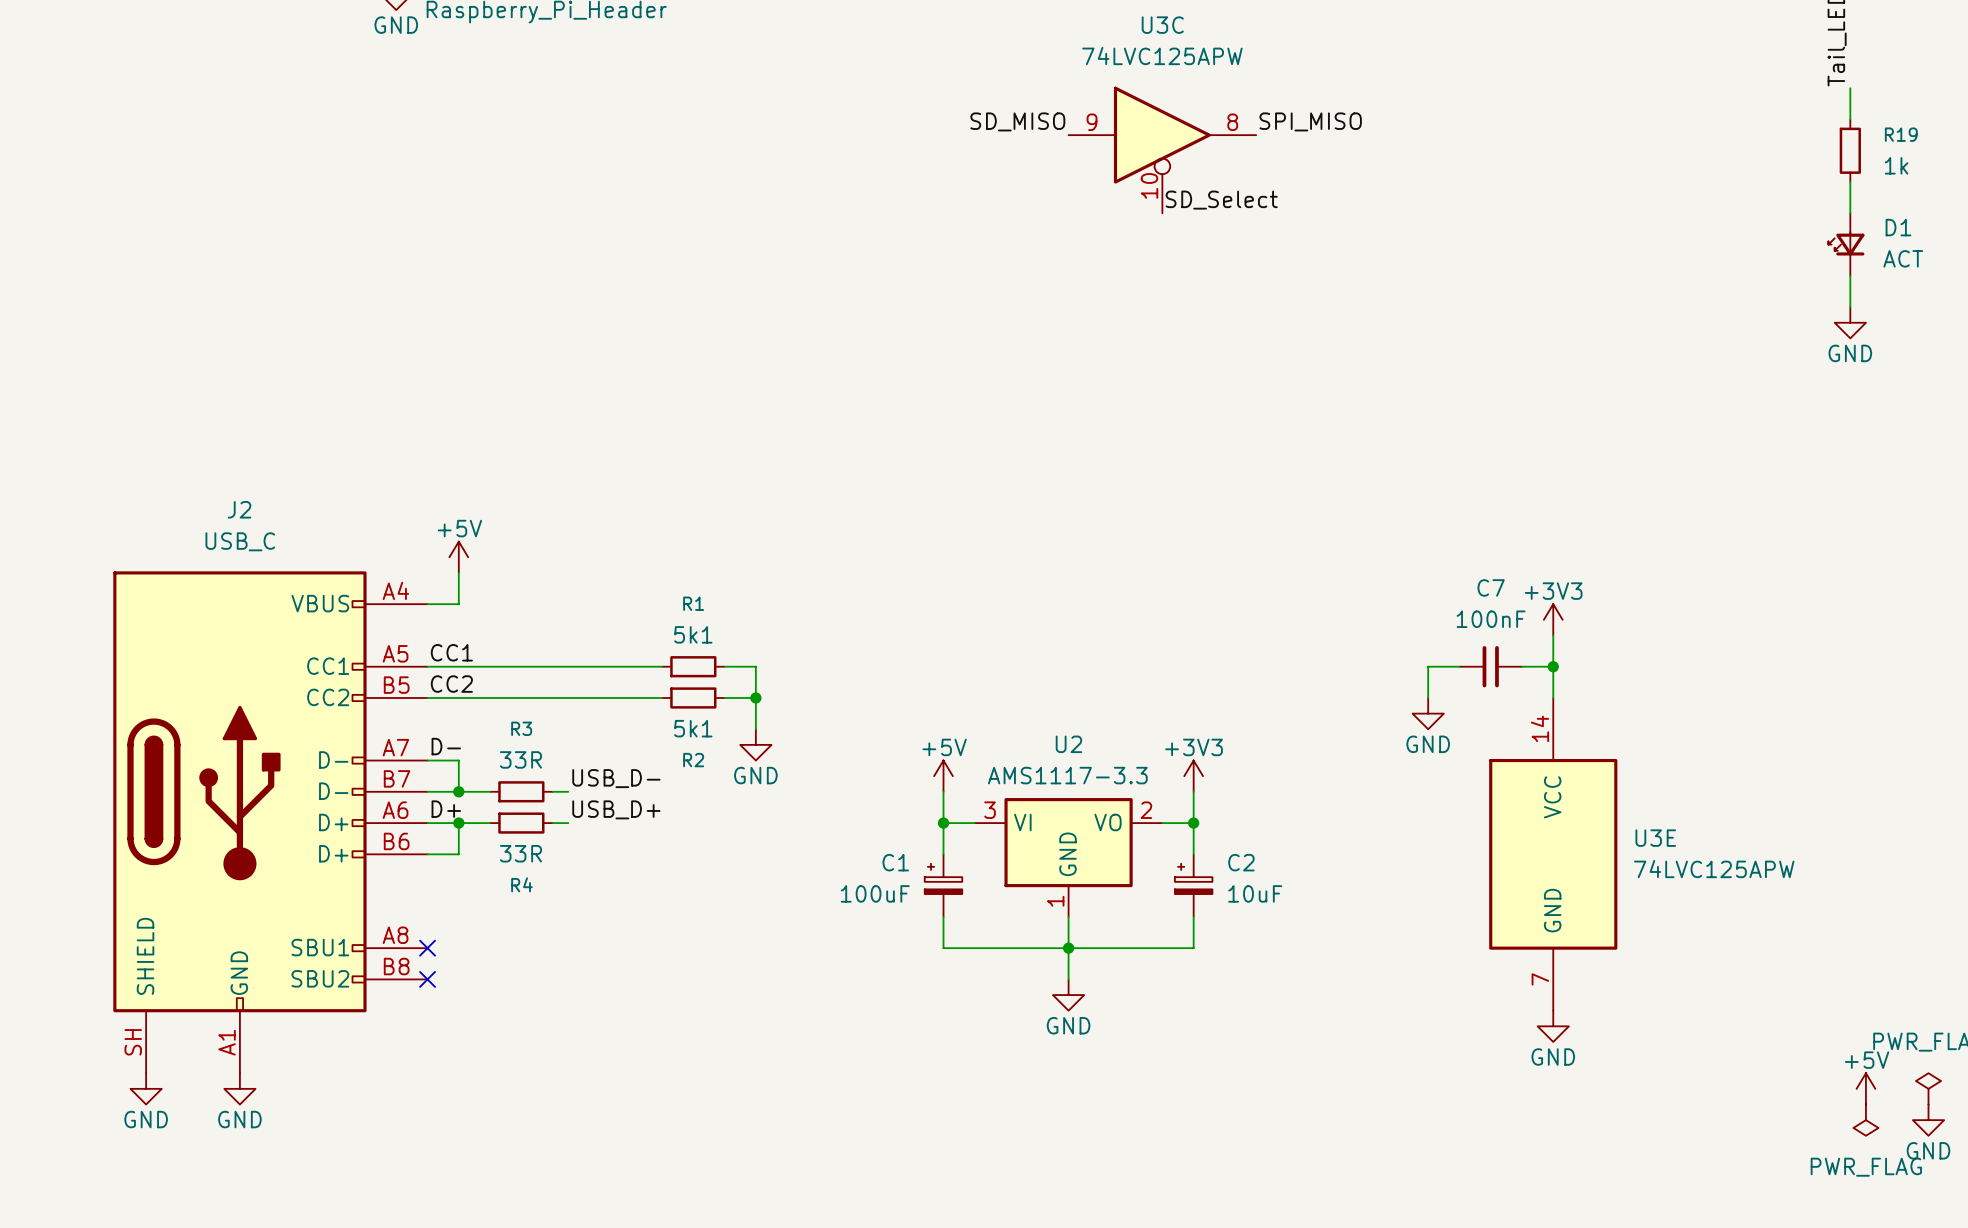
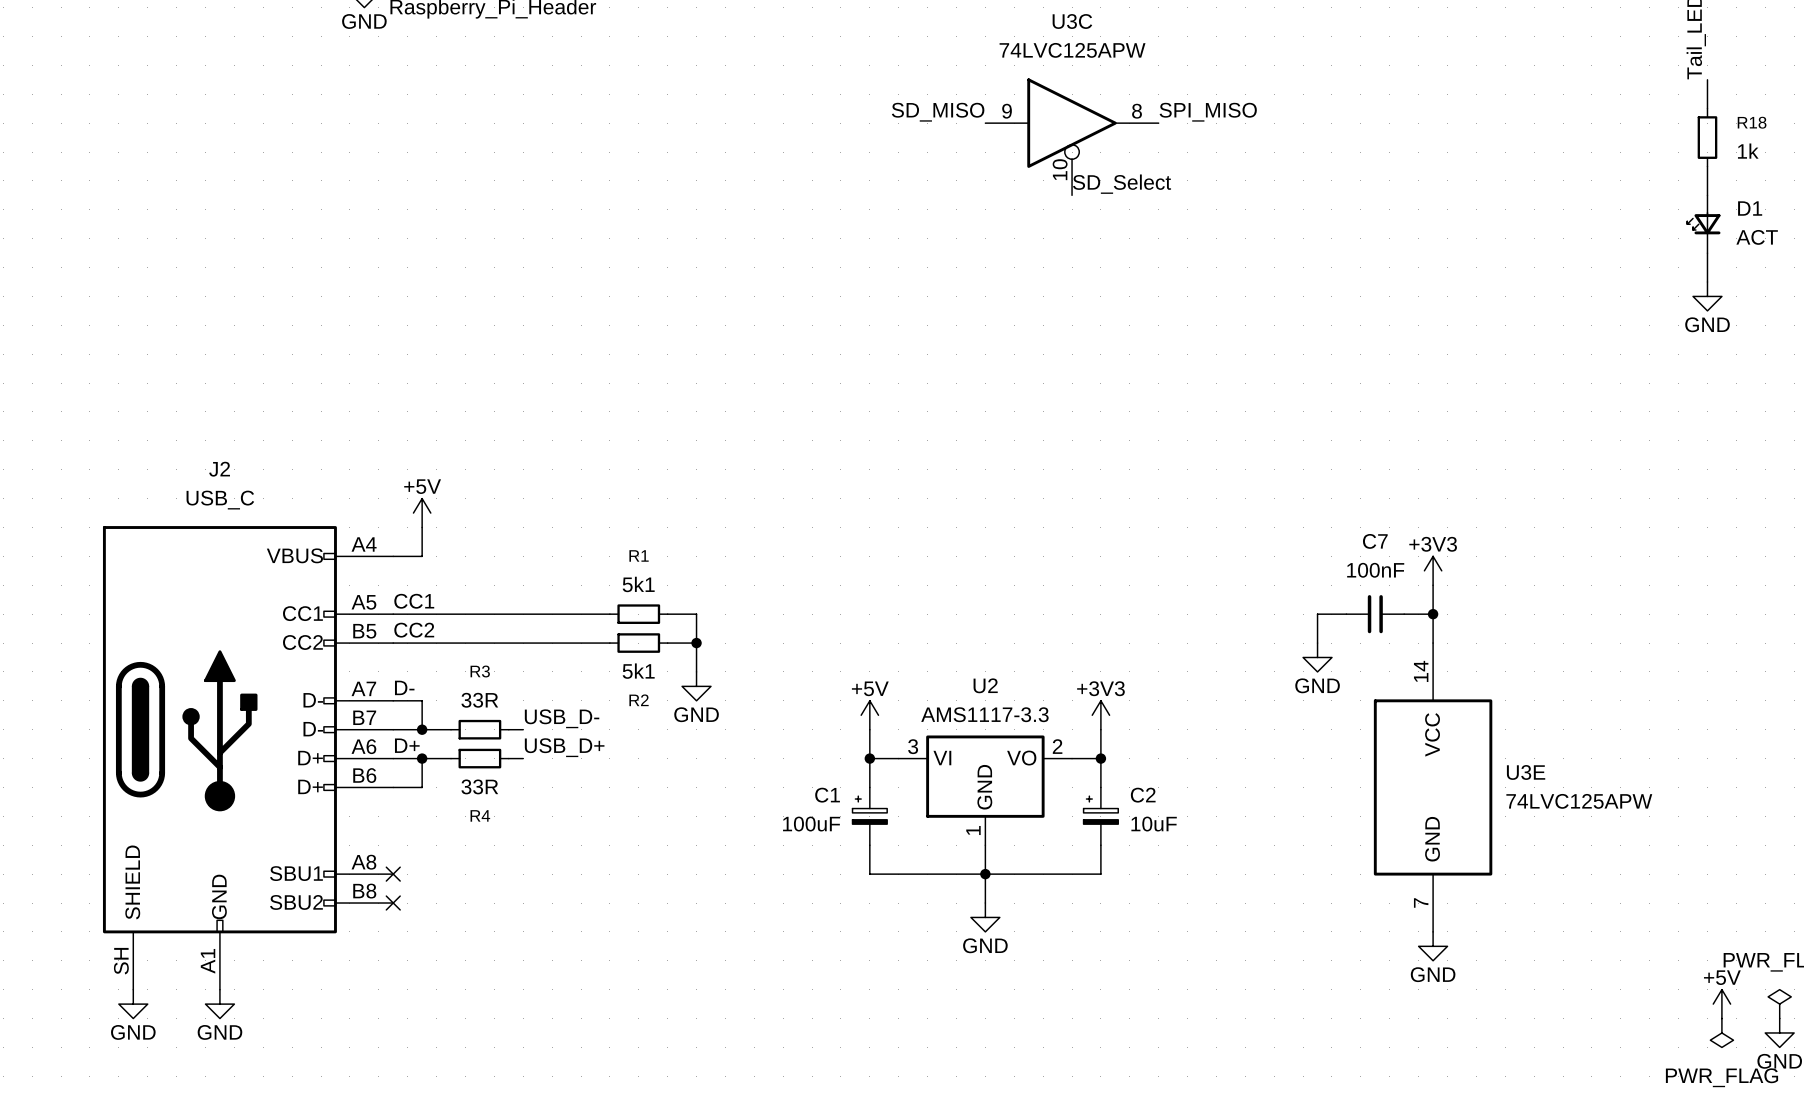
R19 name: R19 (1901, 134) -> R18 (1752, 122)

